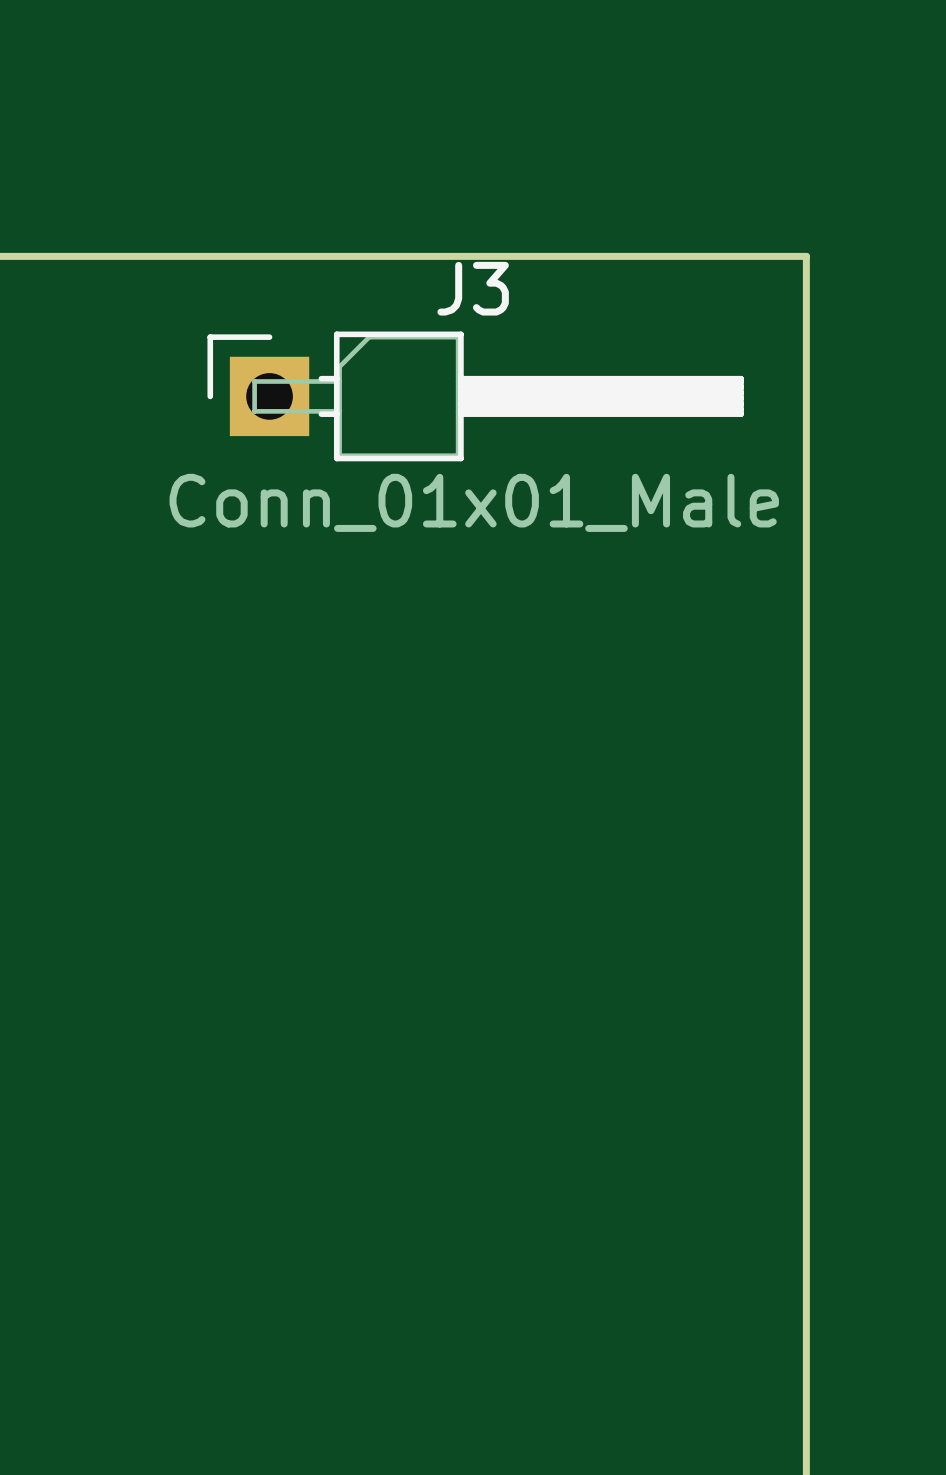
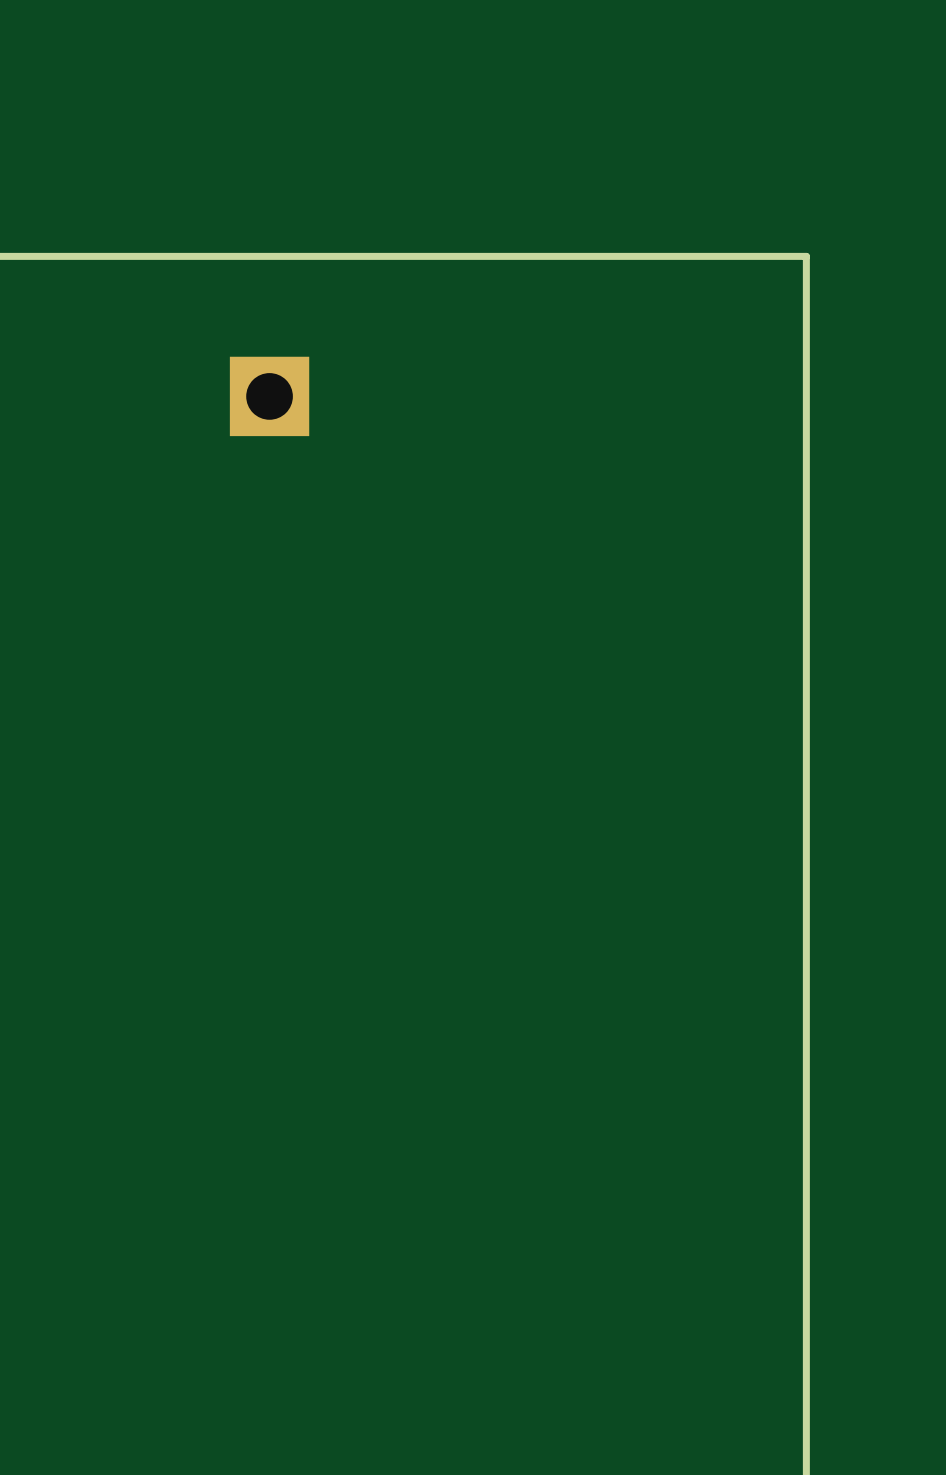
J3 side: bottom (475, 396) -> top (269, 396)

